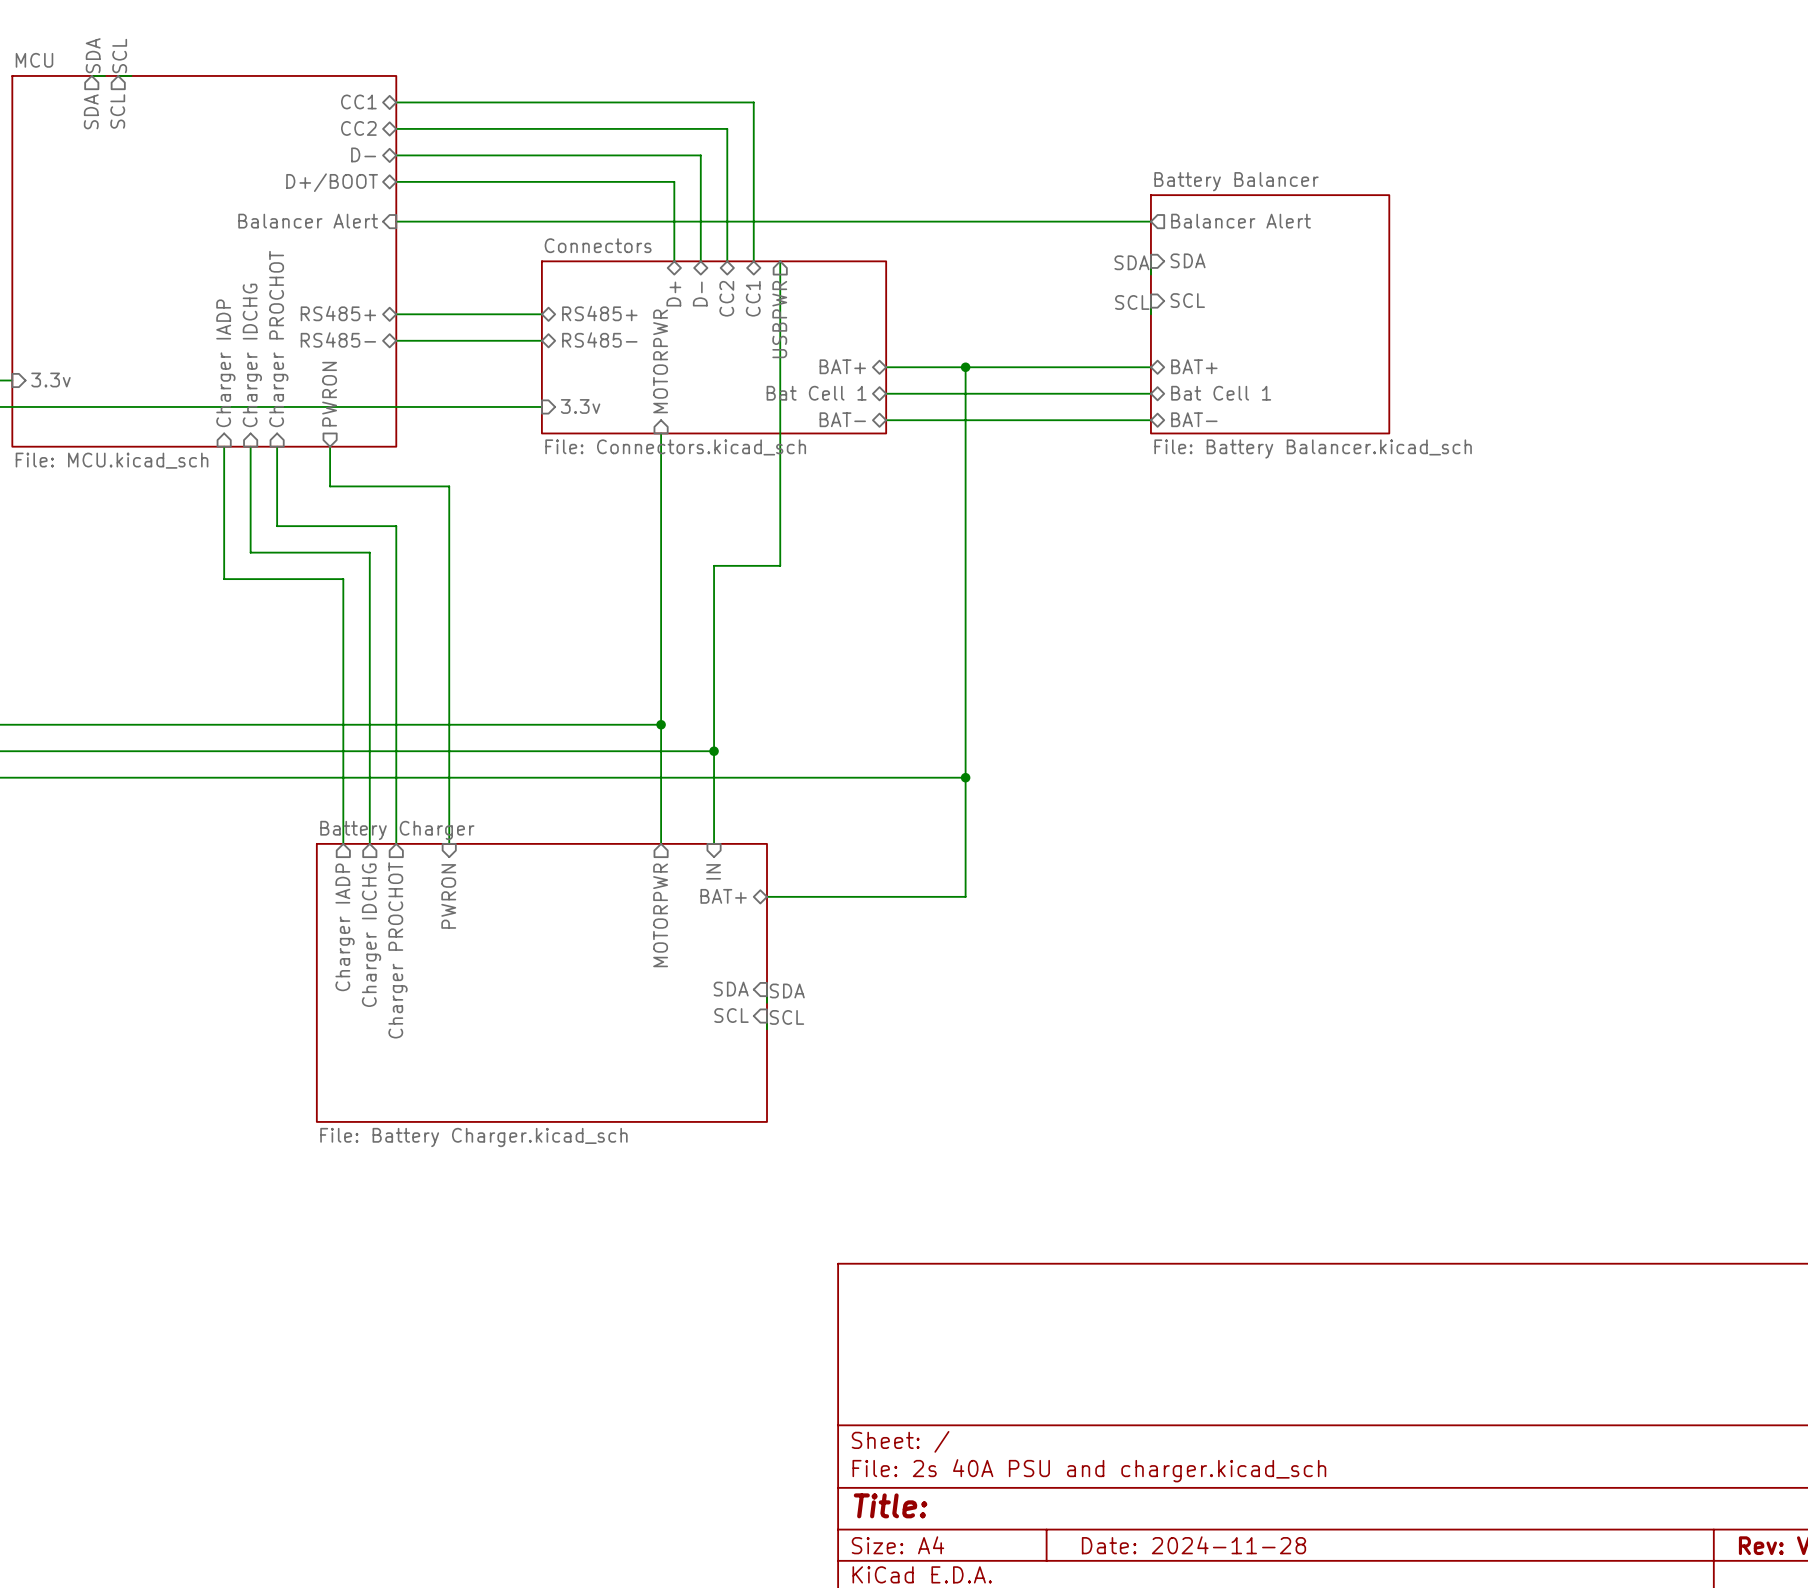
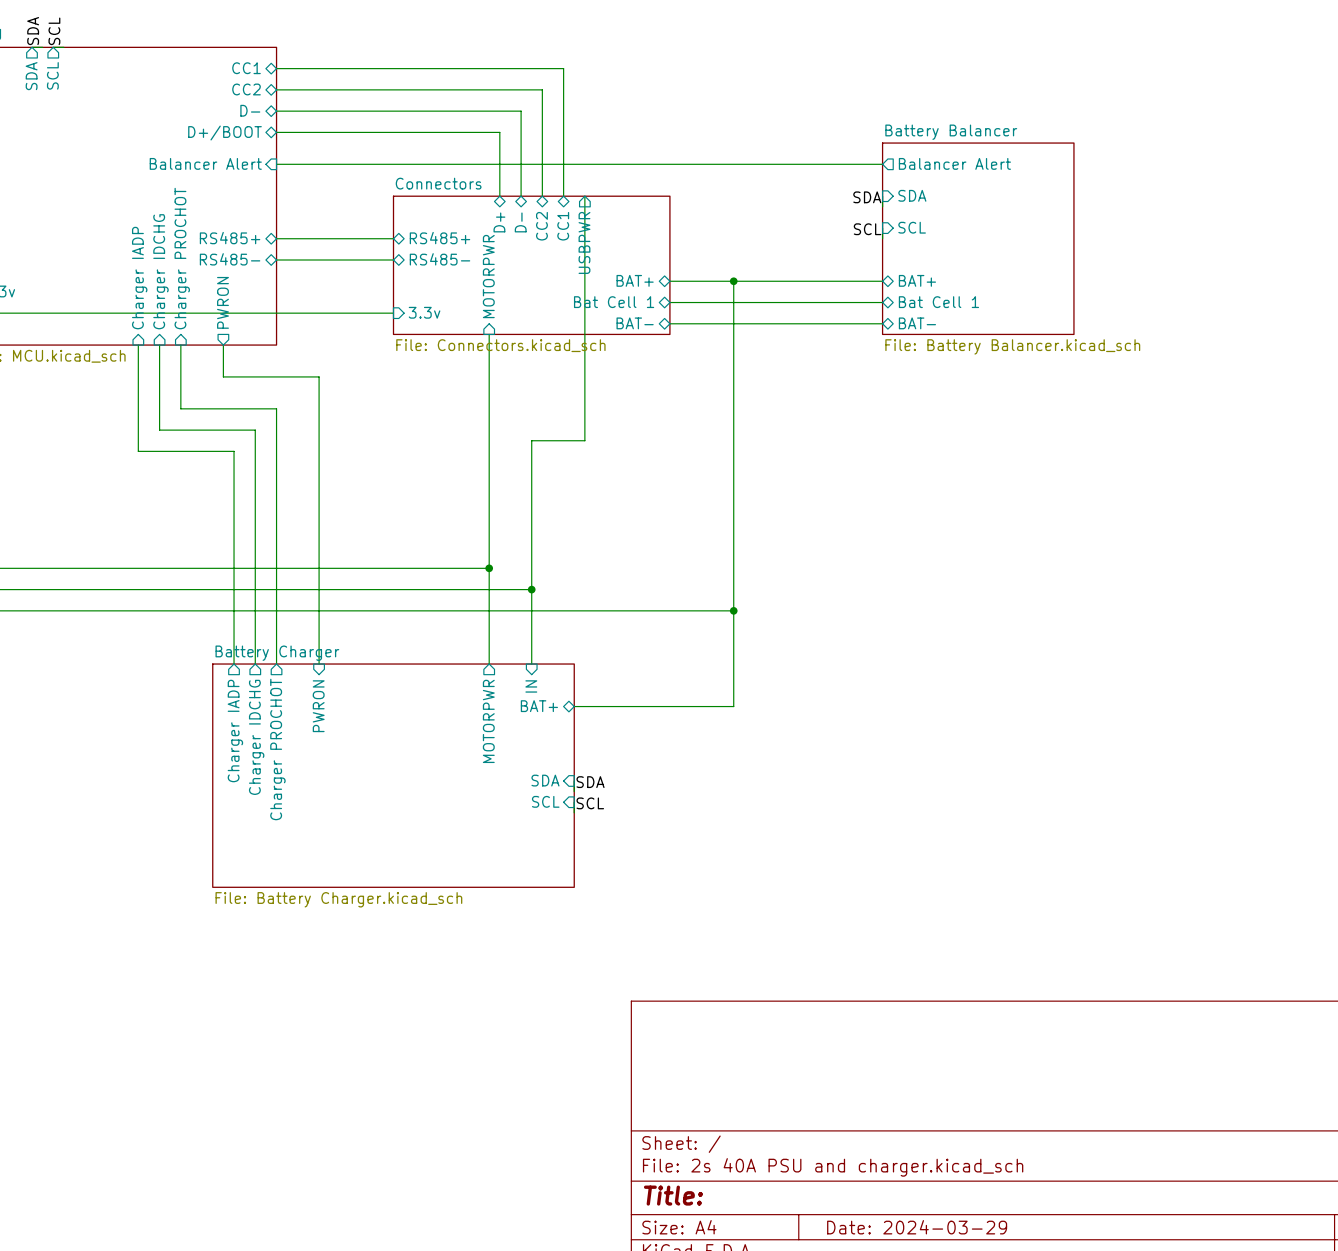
title block: Date: 2024-11-28 (1193, 1545) -> Date: 2024-03-29 (917, 1227)

